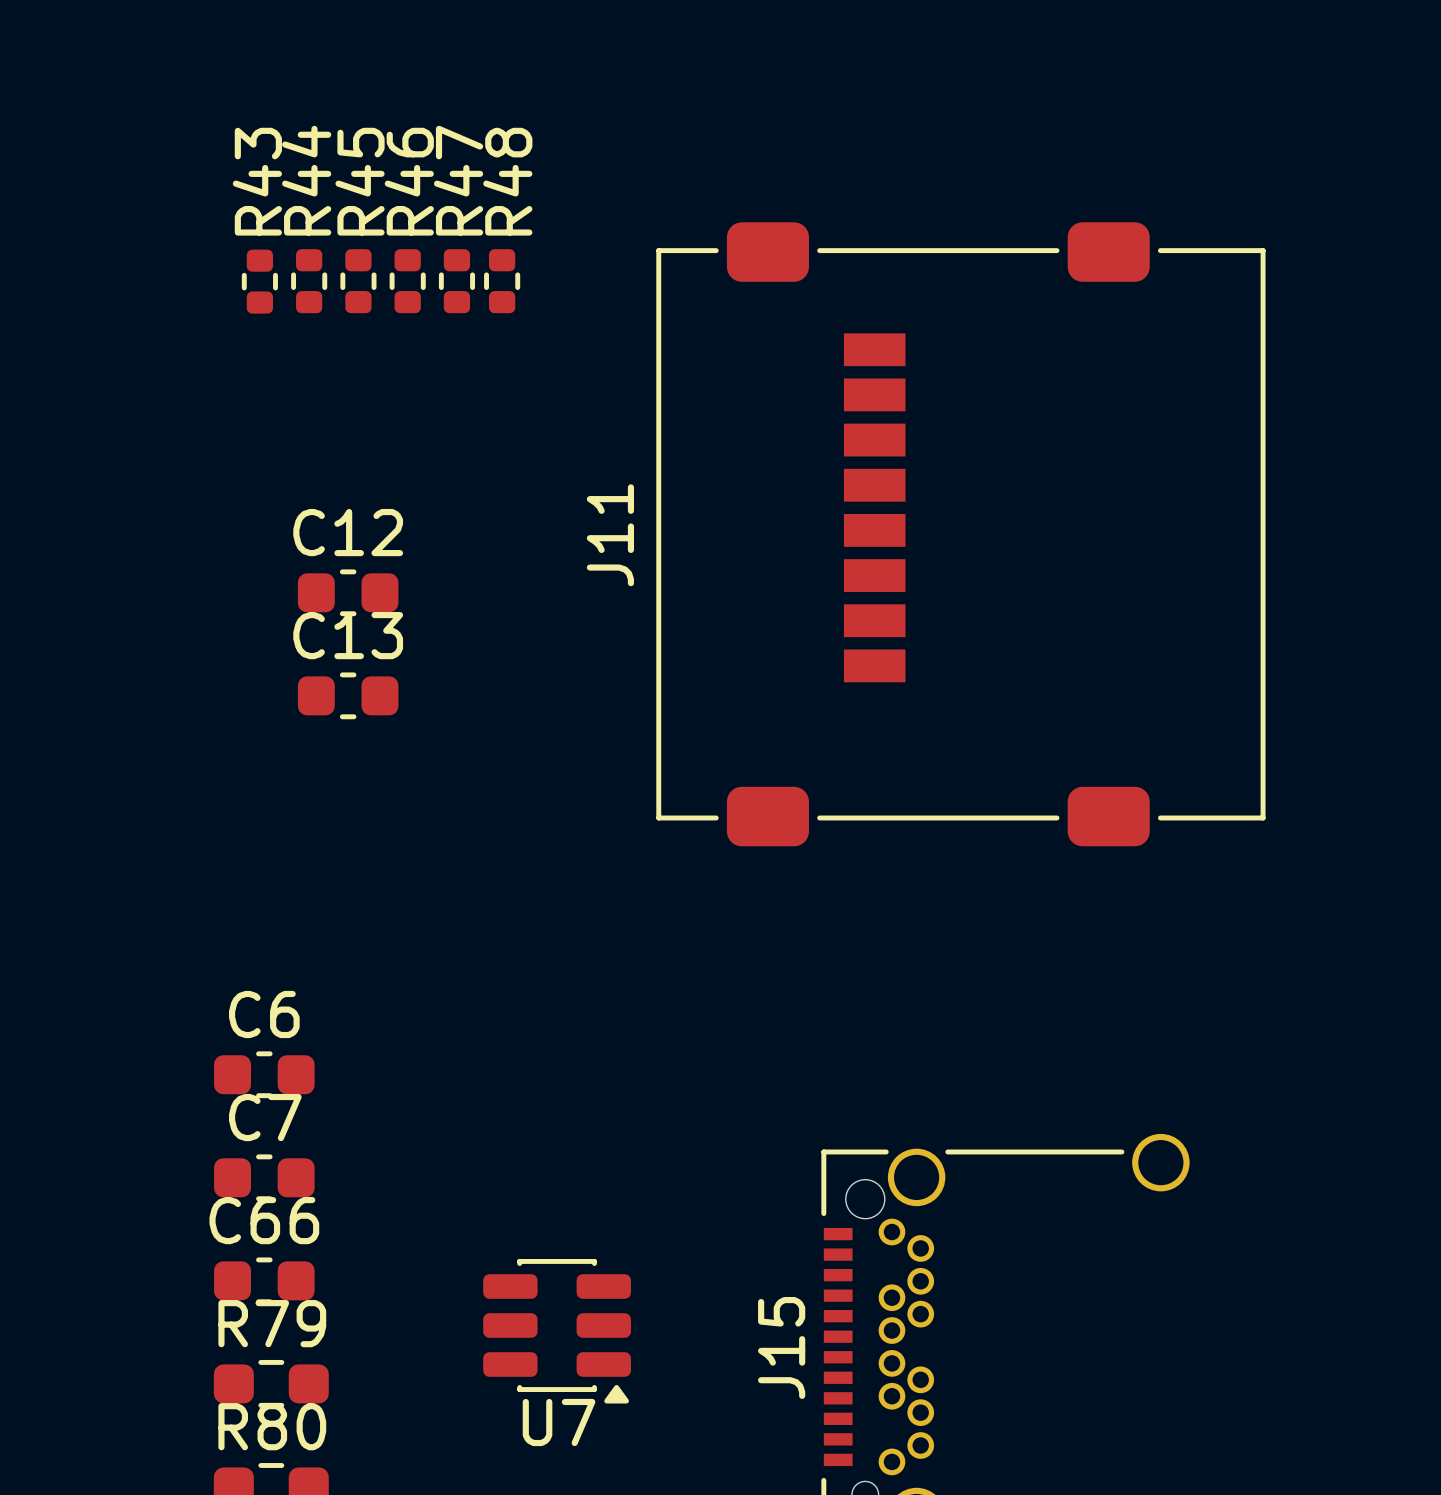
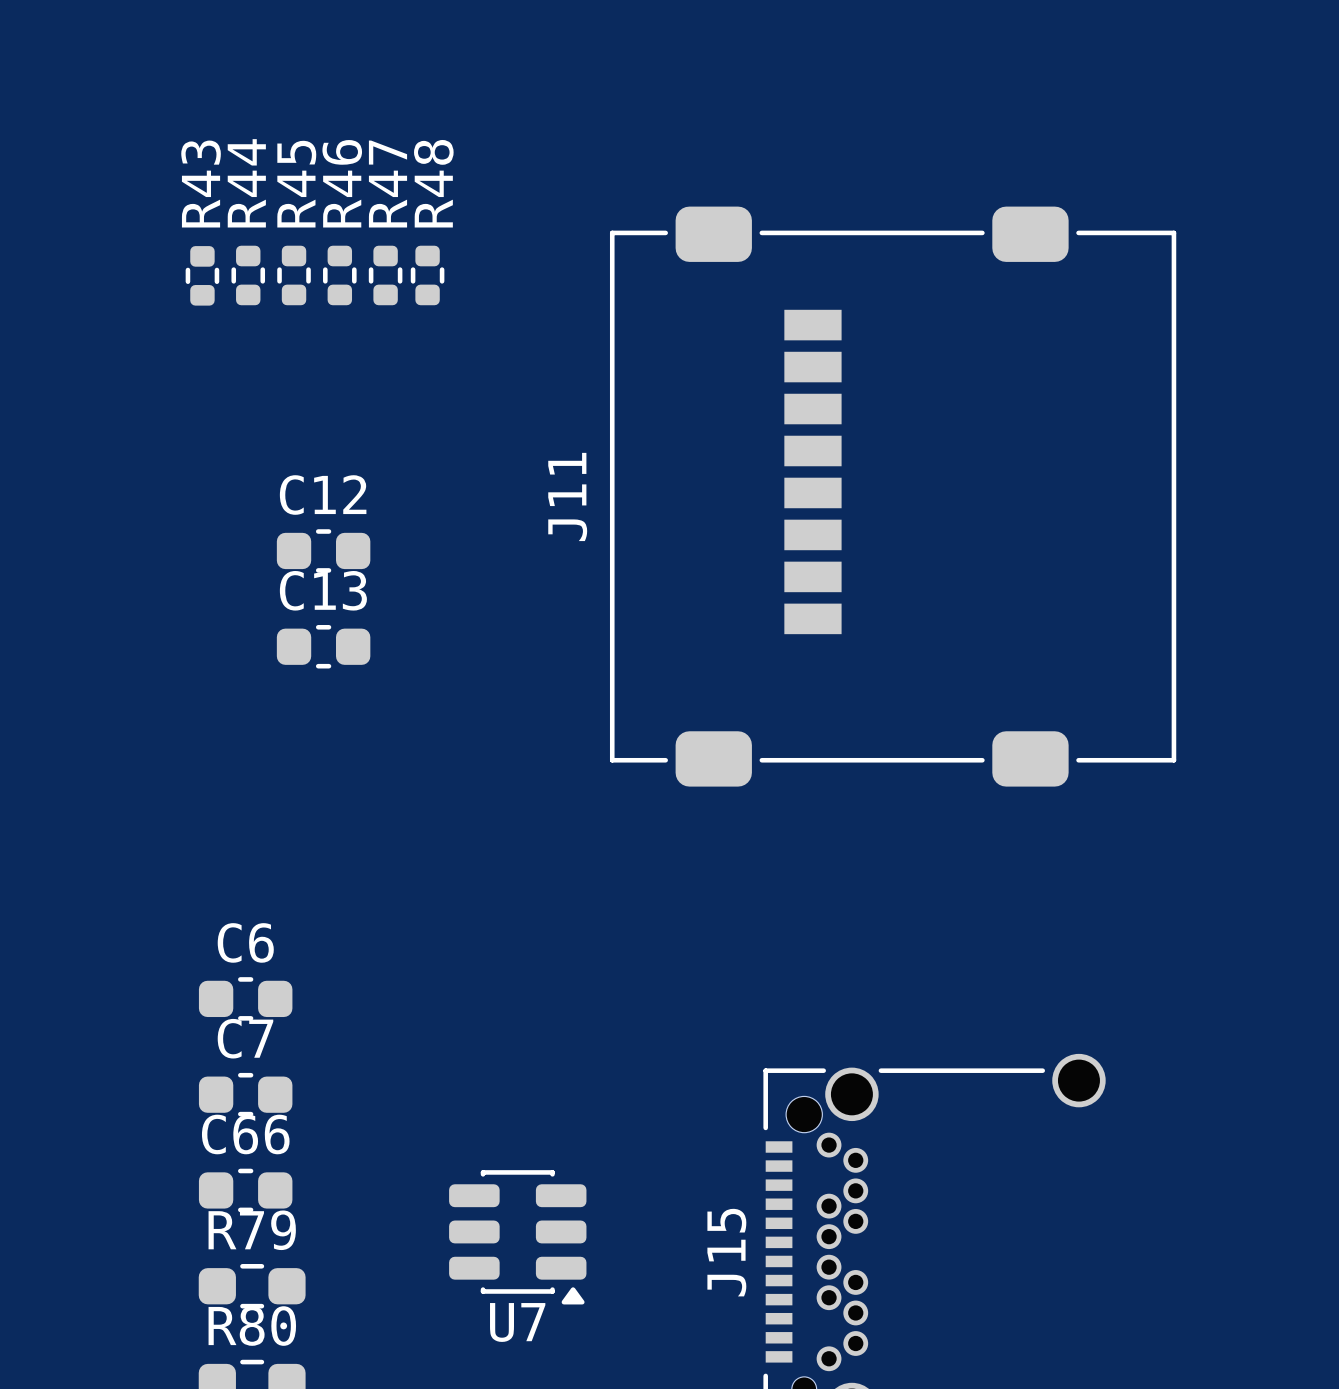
R43 position: (259, 281) -> (202, 275)
R44 position: (309, 281) -> (248, 275)
R45 position: (358, 281) -> (294, 275)
R46 position: (407, 281) -> (339, 275)
R47 position: (456, 281) -> (385, 275)
R48 position: (502, 281) -> (427, 275)

